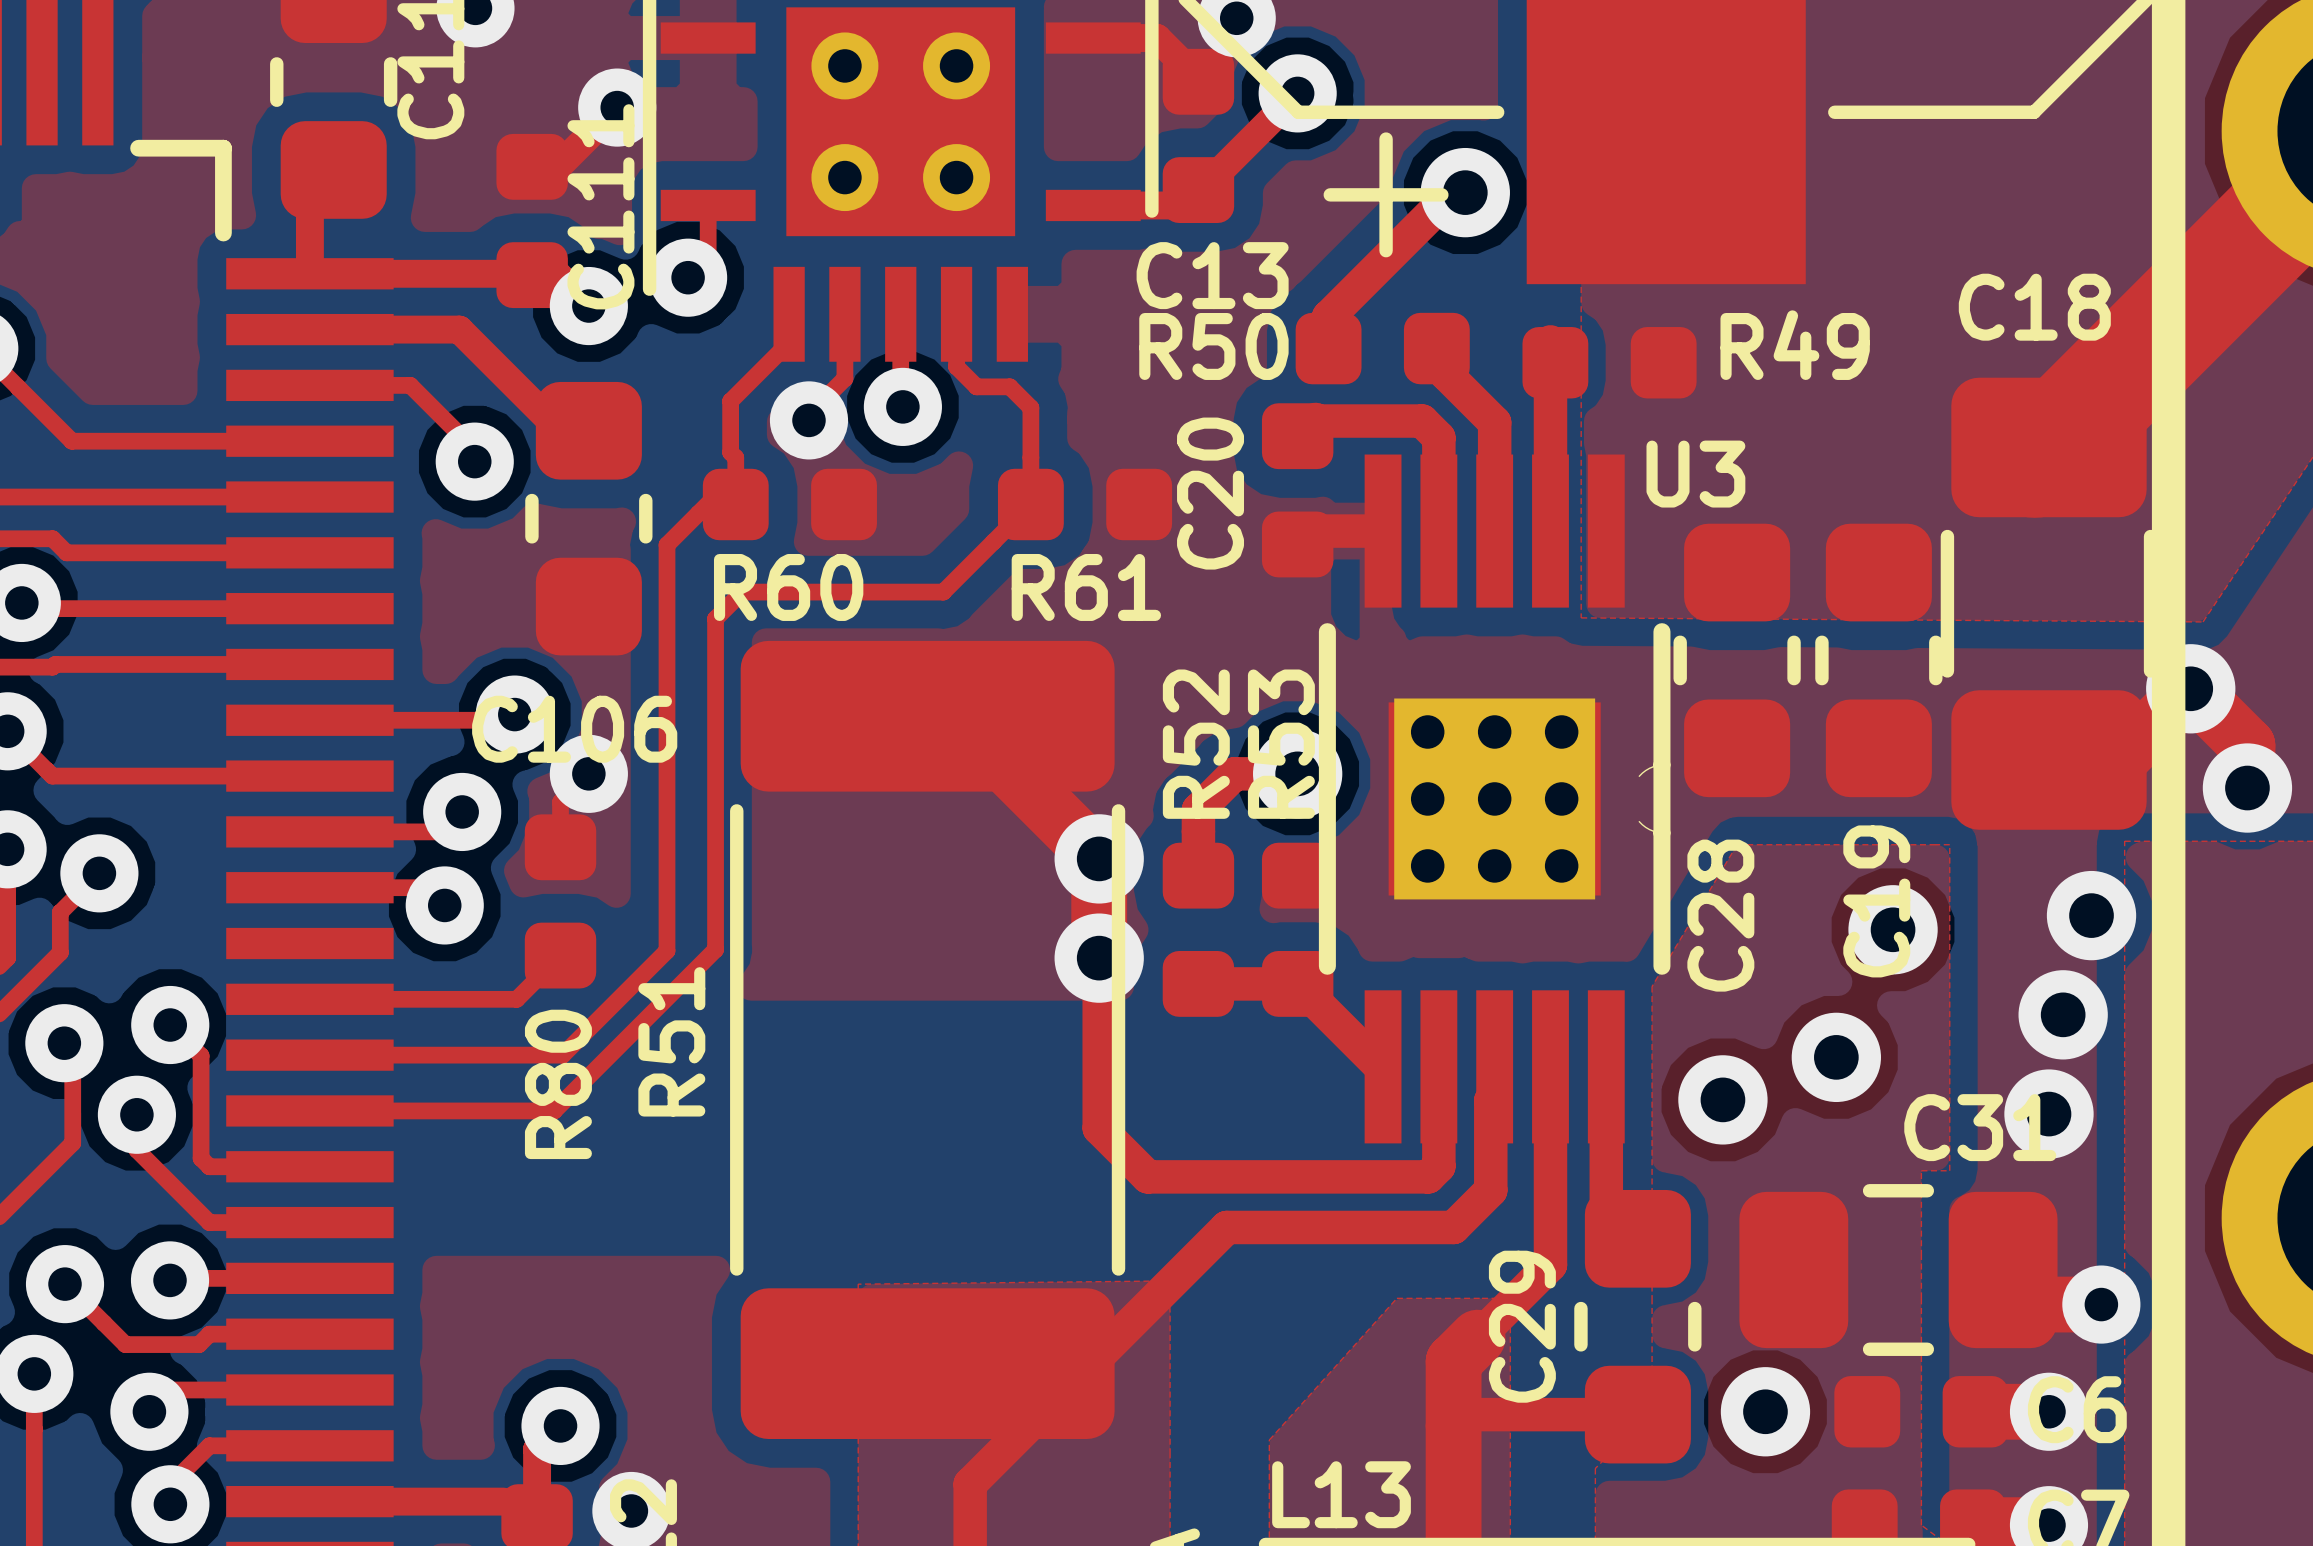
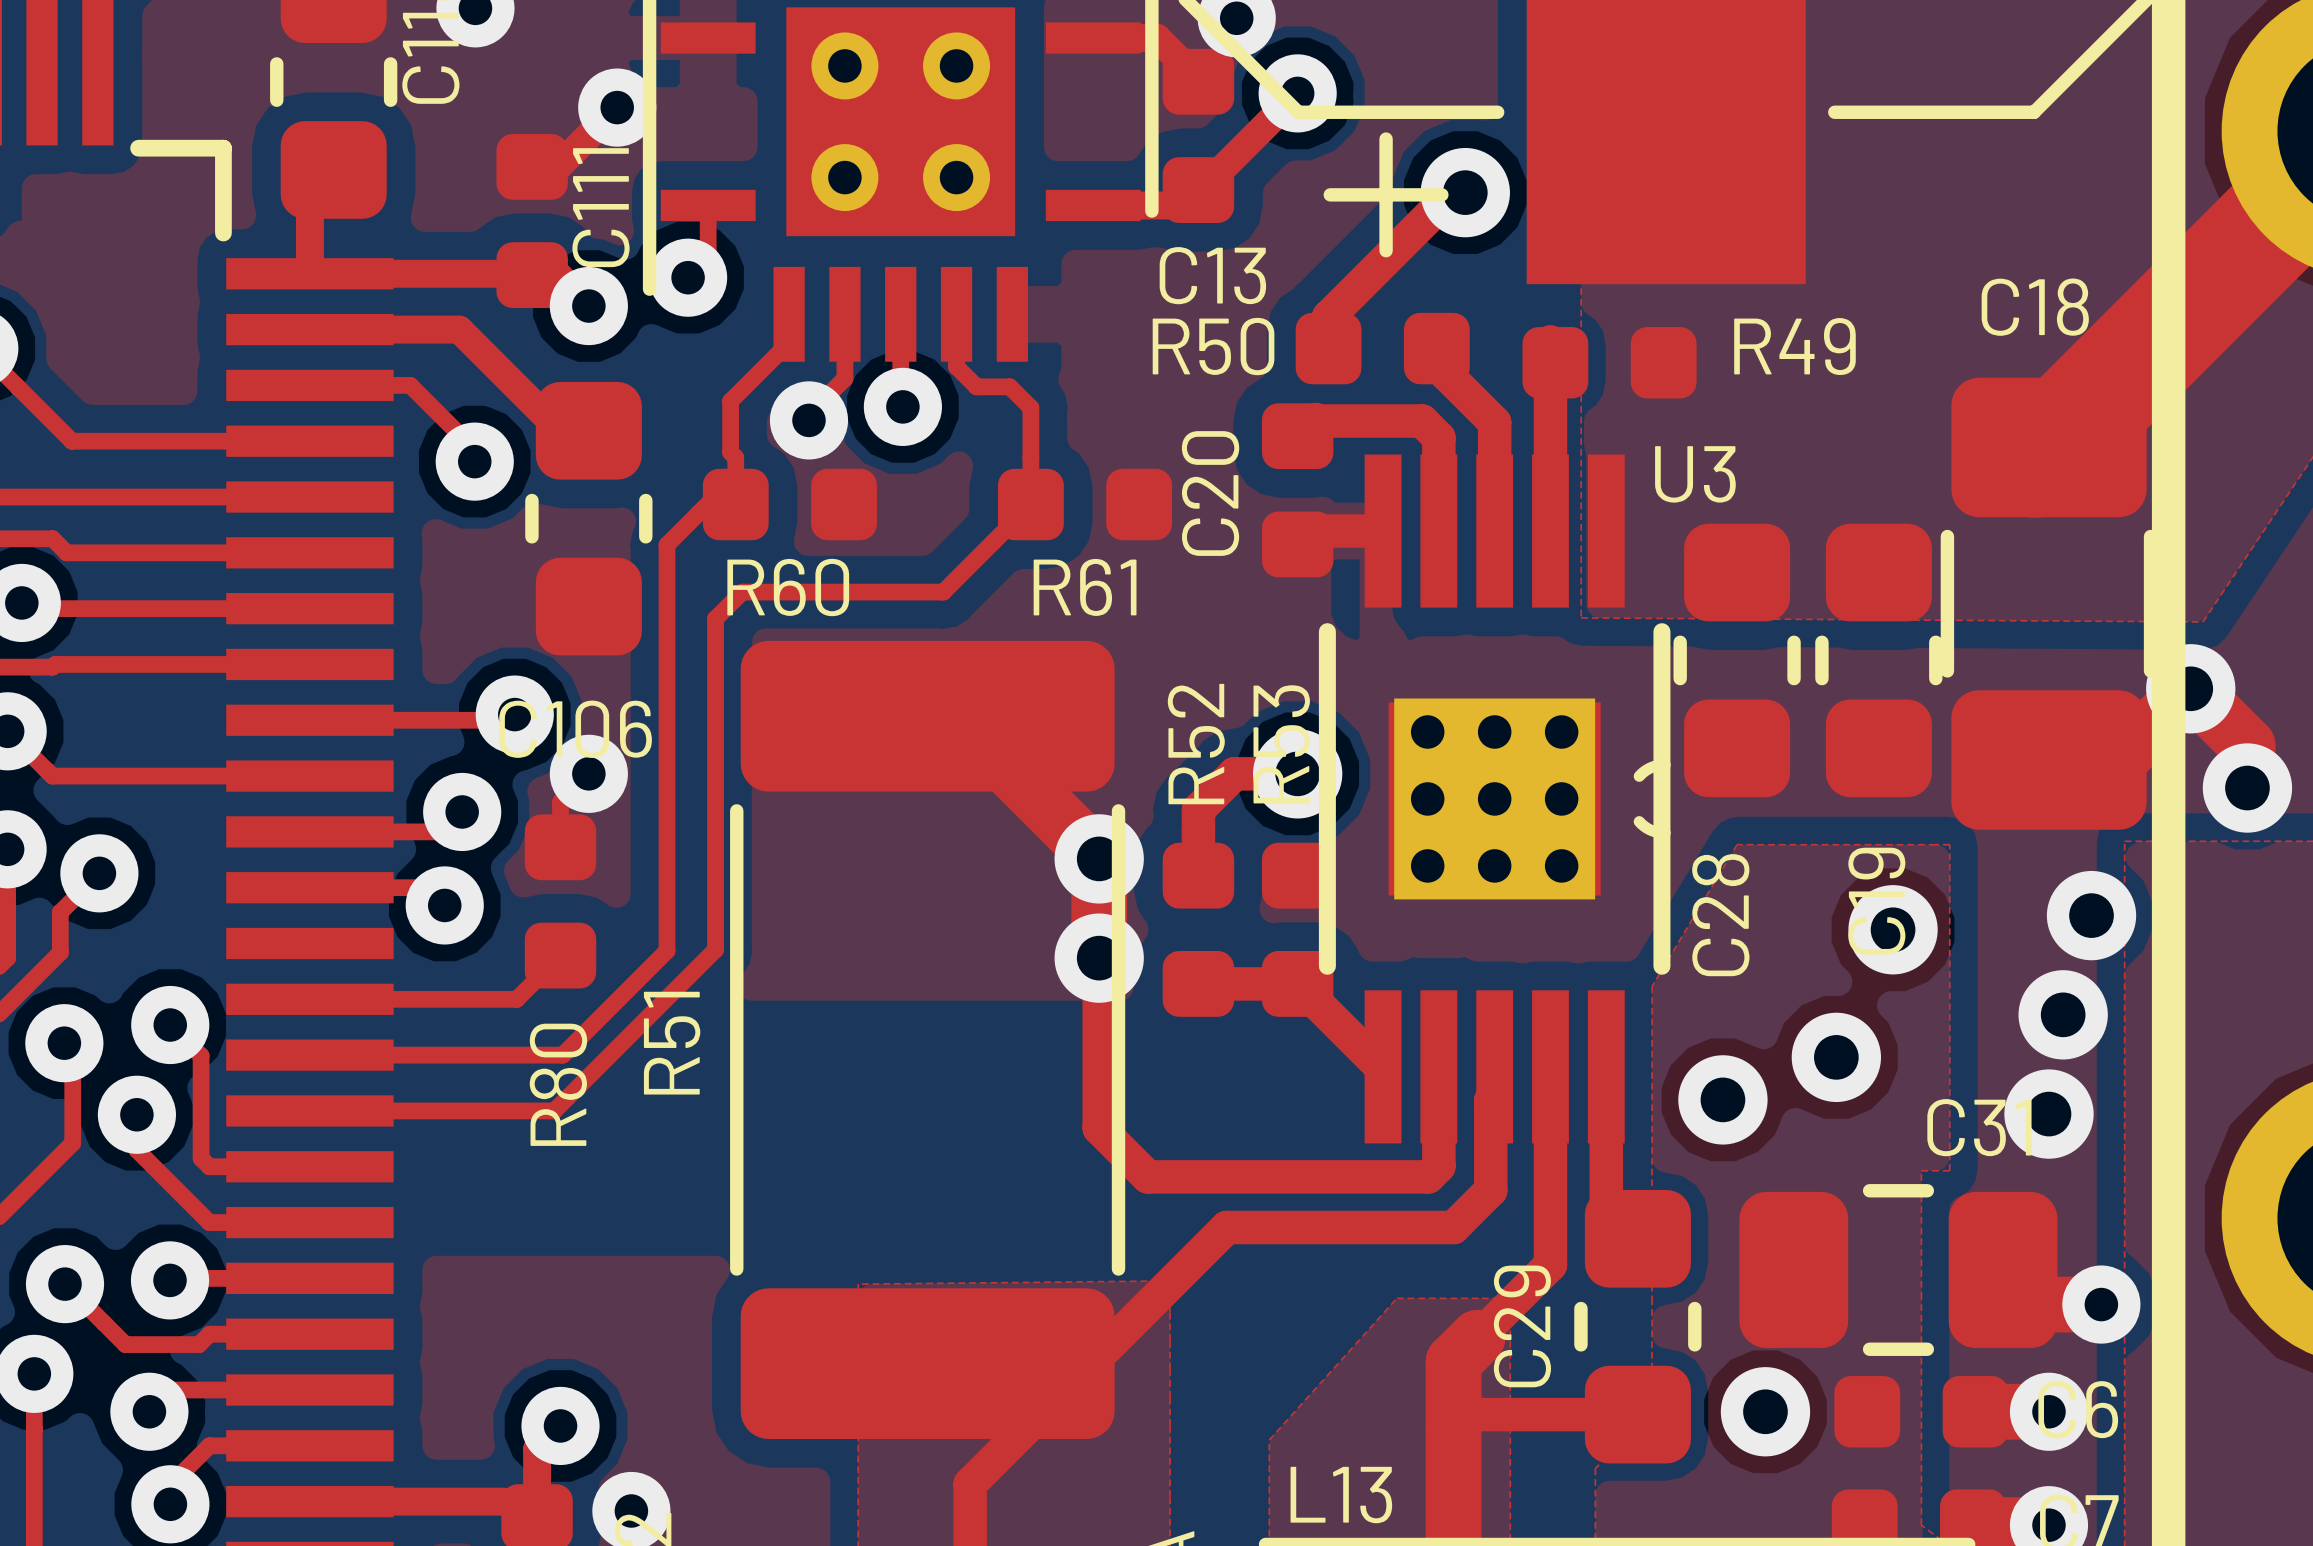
U3 footprint: [1318, 454, 1671, 1144] -> [1318, 454, 1671, 1144]

